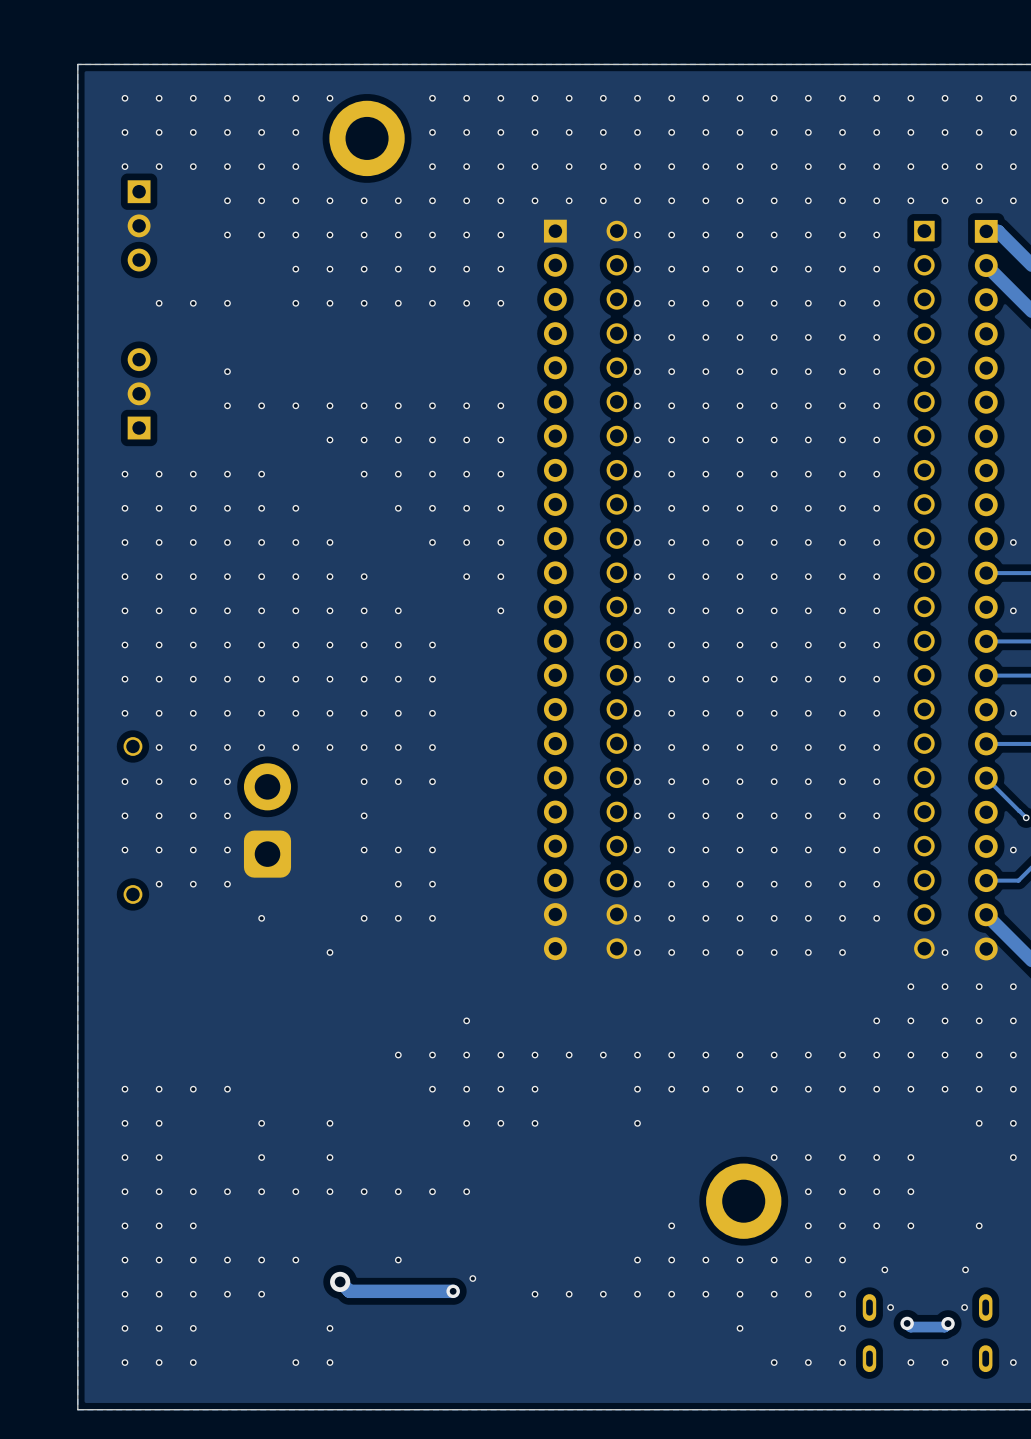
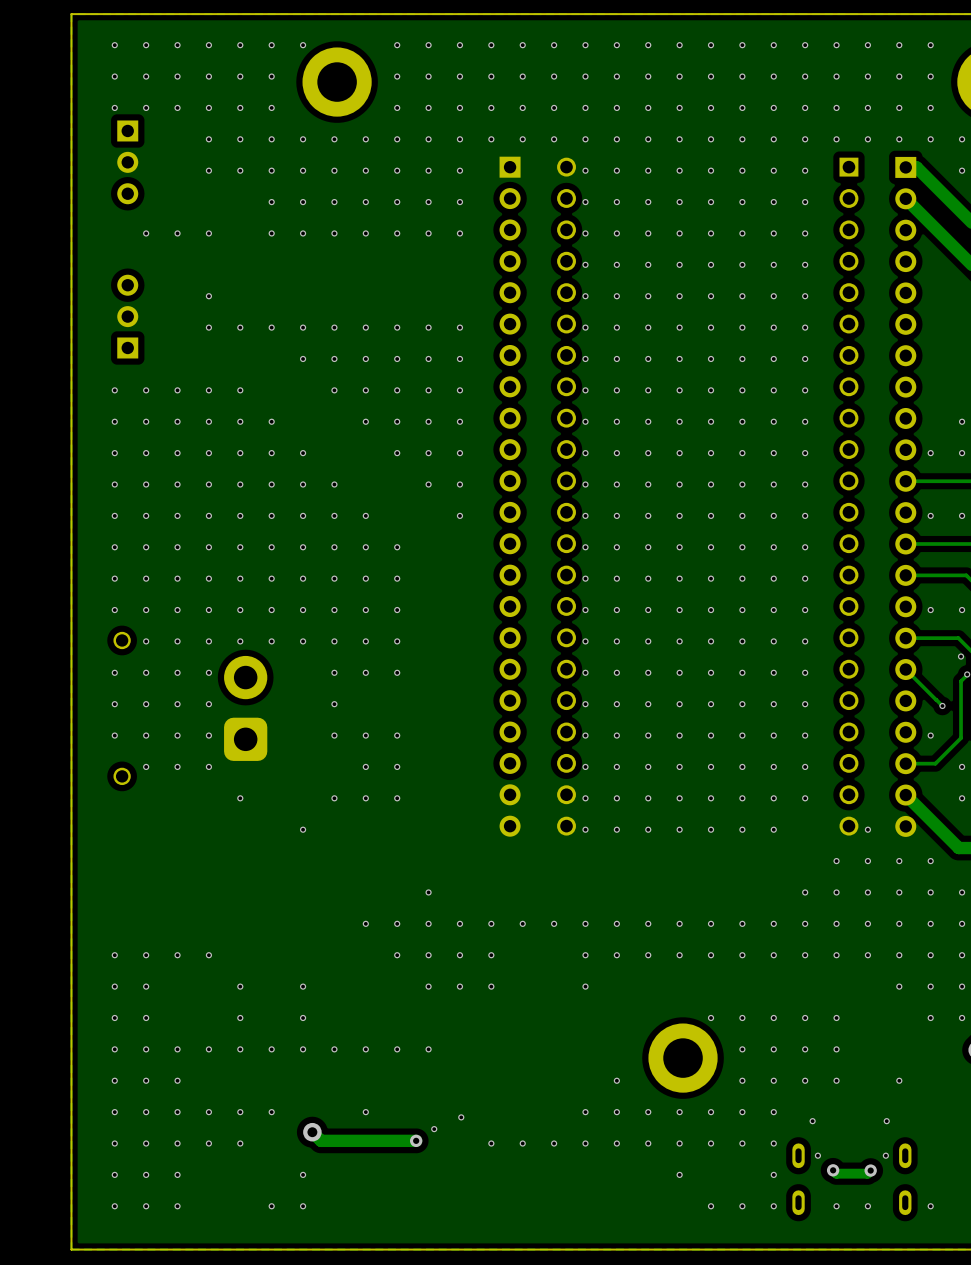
via: none -> (461, 1117)

